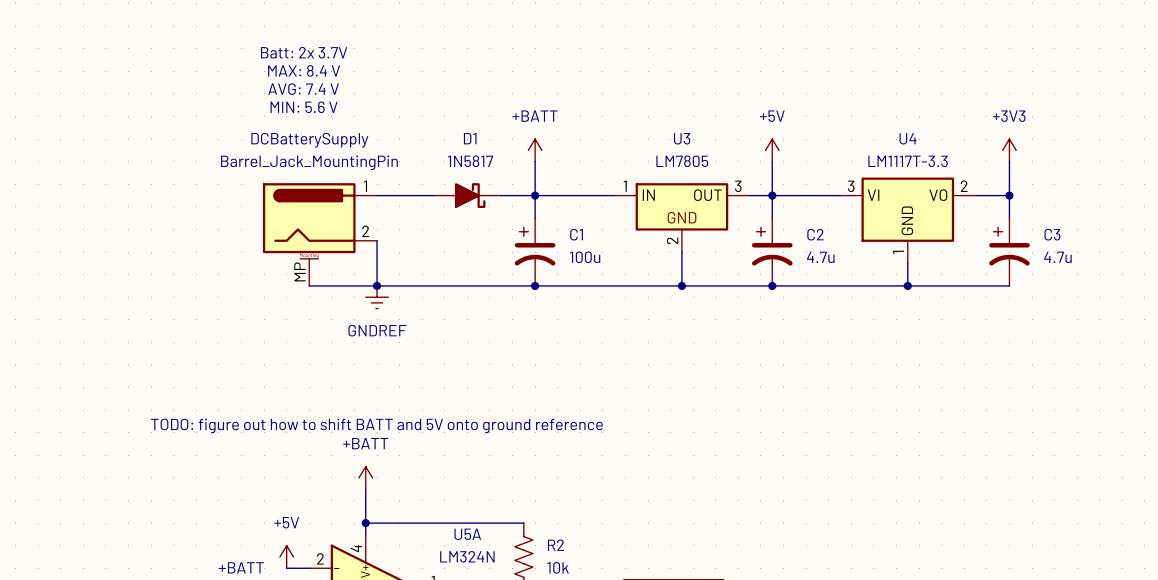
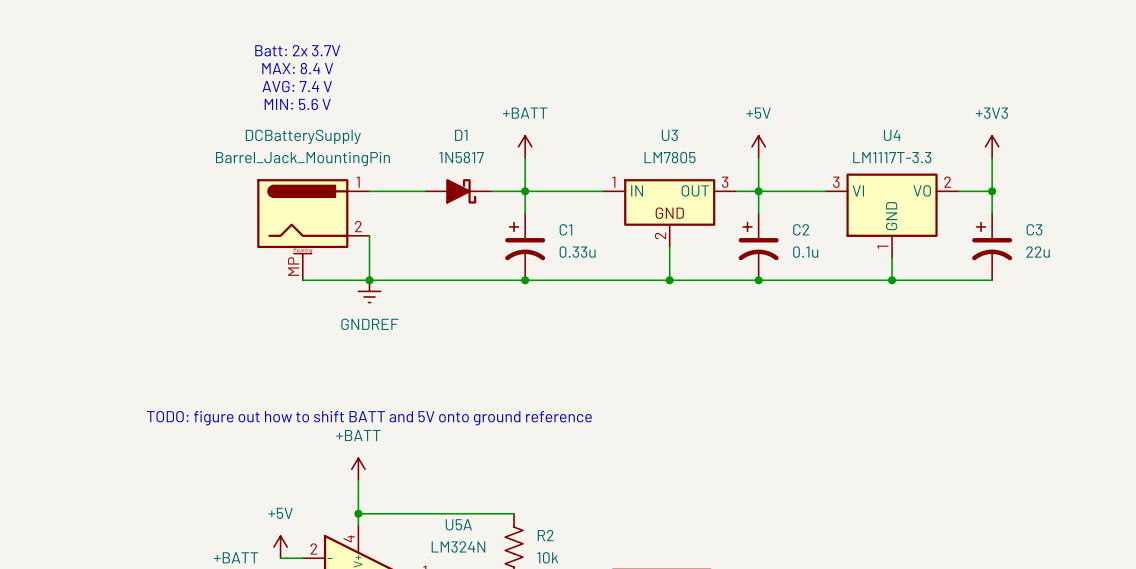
C1 value: 100u (585, 257) -> 0.33u (577, 252)
C2 value: 4.7u (820, 257) -> 0.1u (805, 252)
C3 value: 4.7u (1057, 257) -> 22u (1038, 252)

